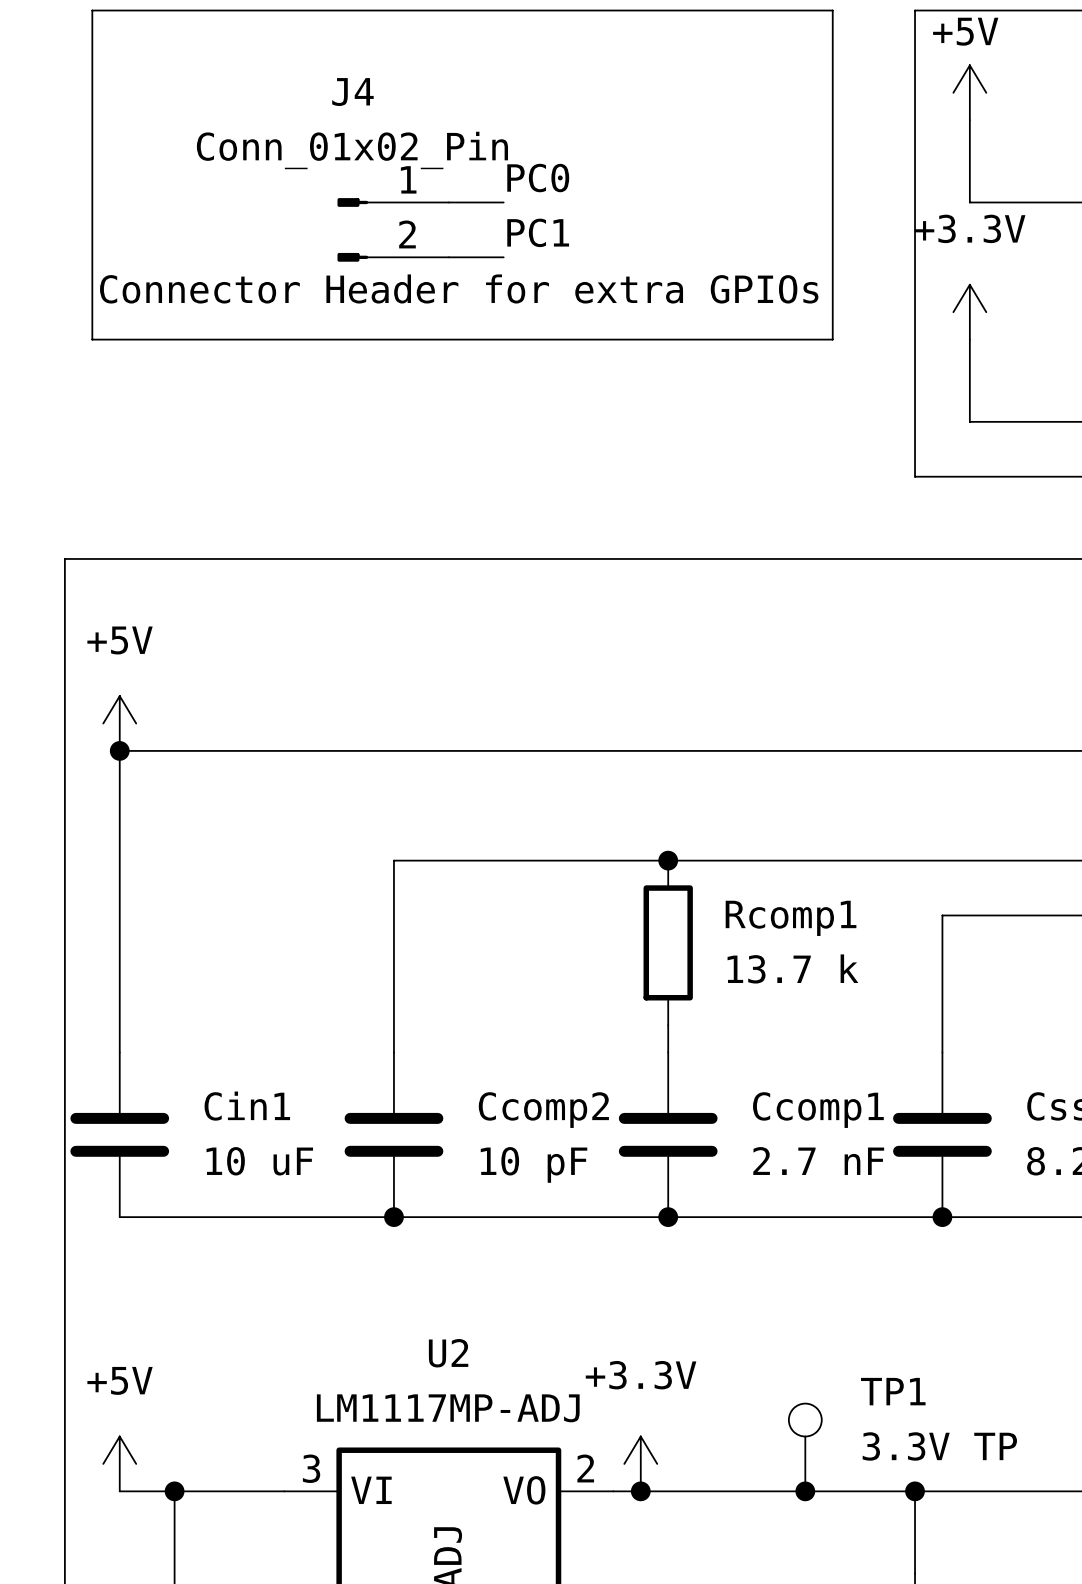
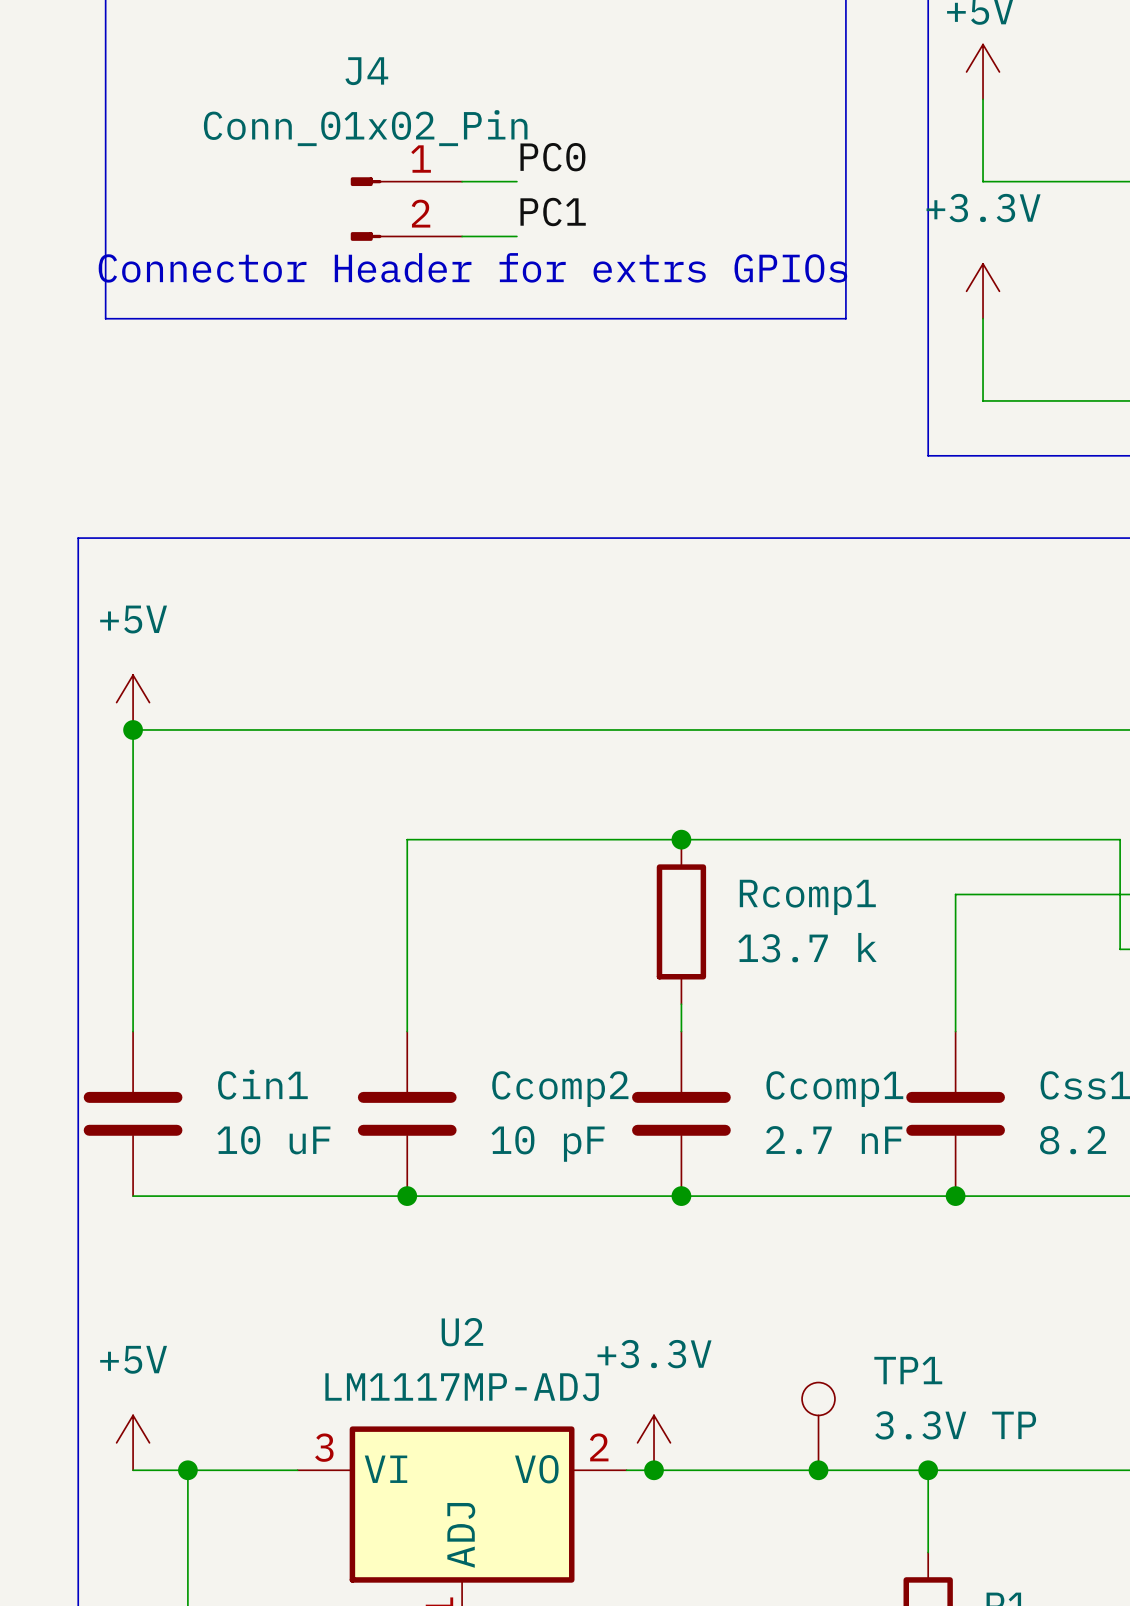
text: Connector Header for extra GPIOs (459, 288) -> Connector Header for extrs GPIOs (472, 267)

